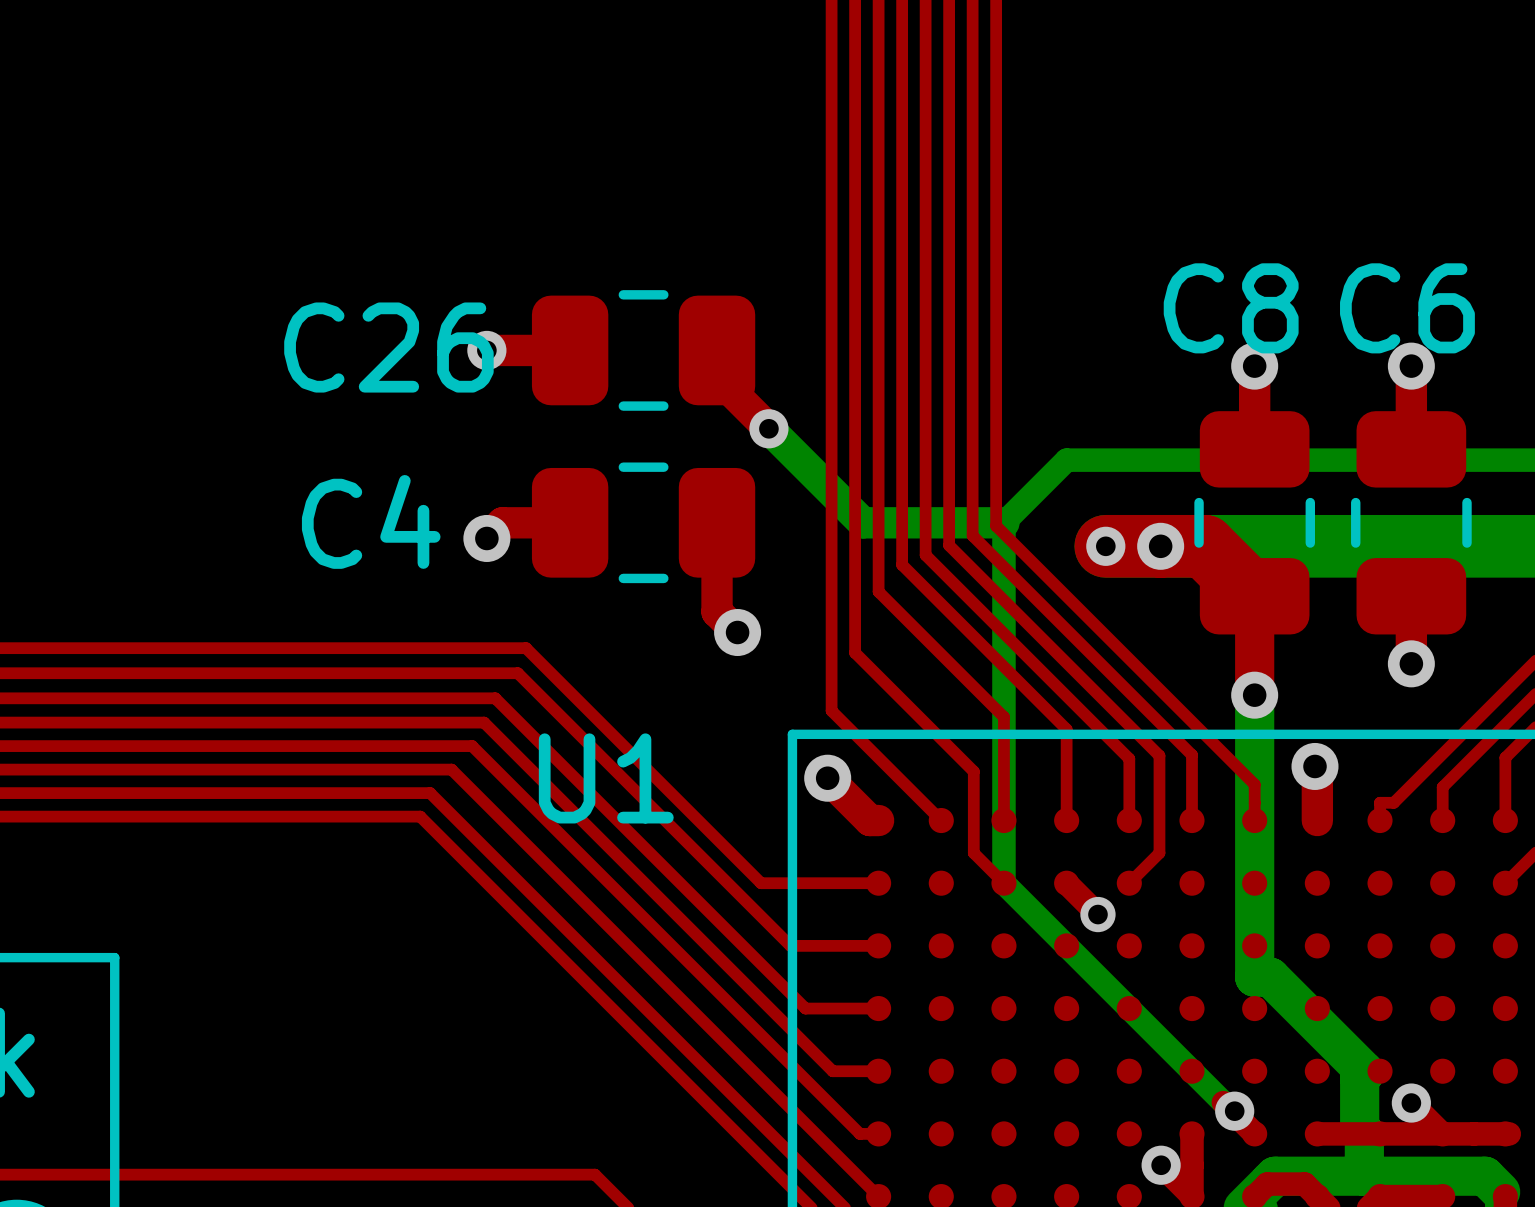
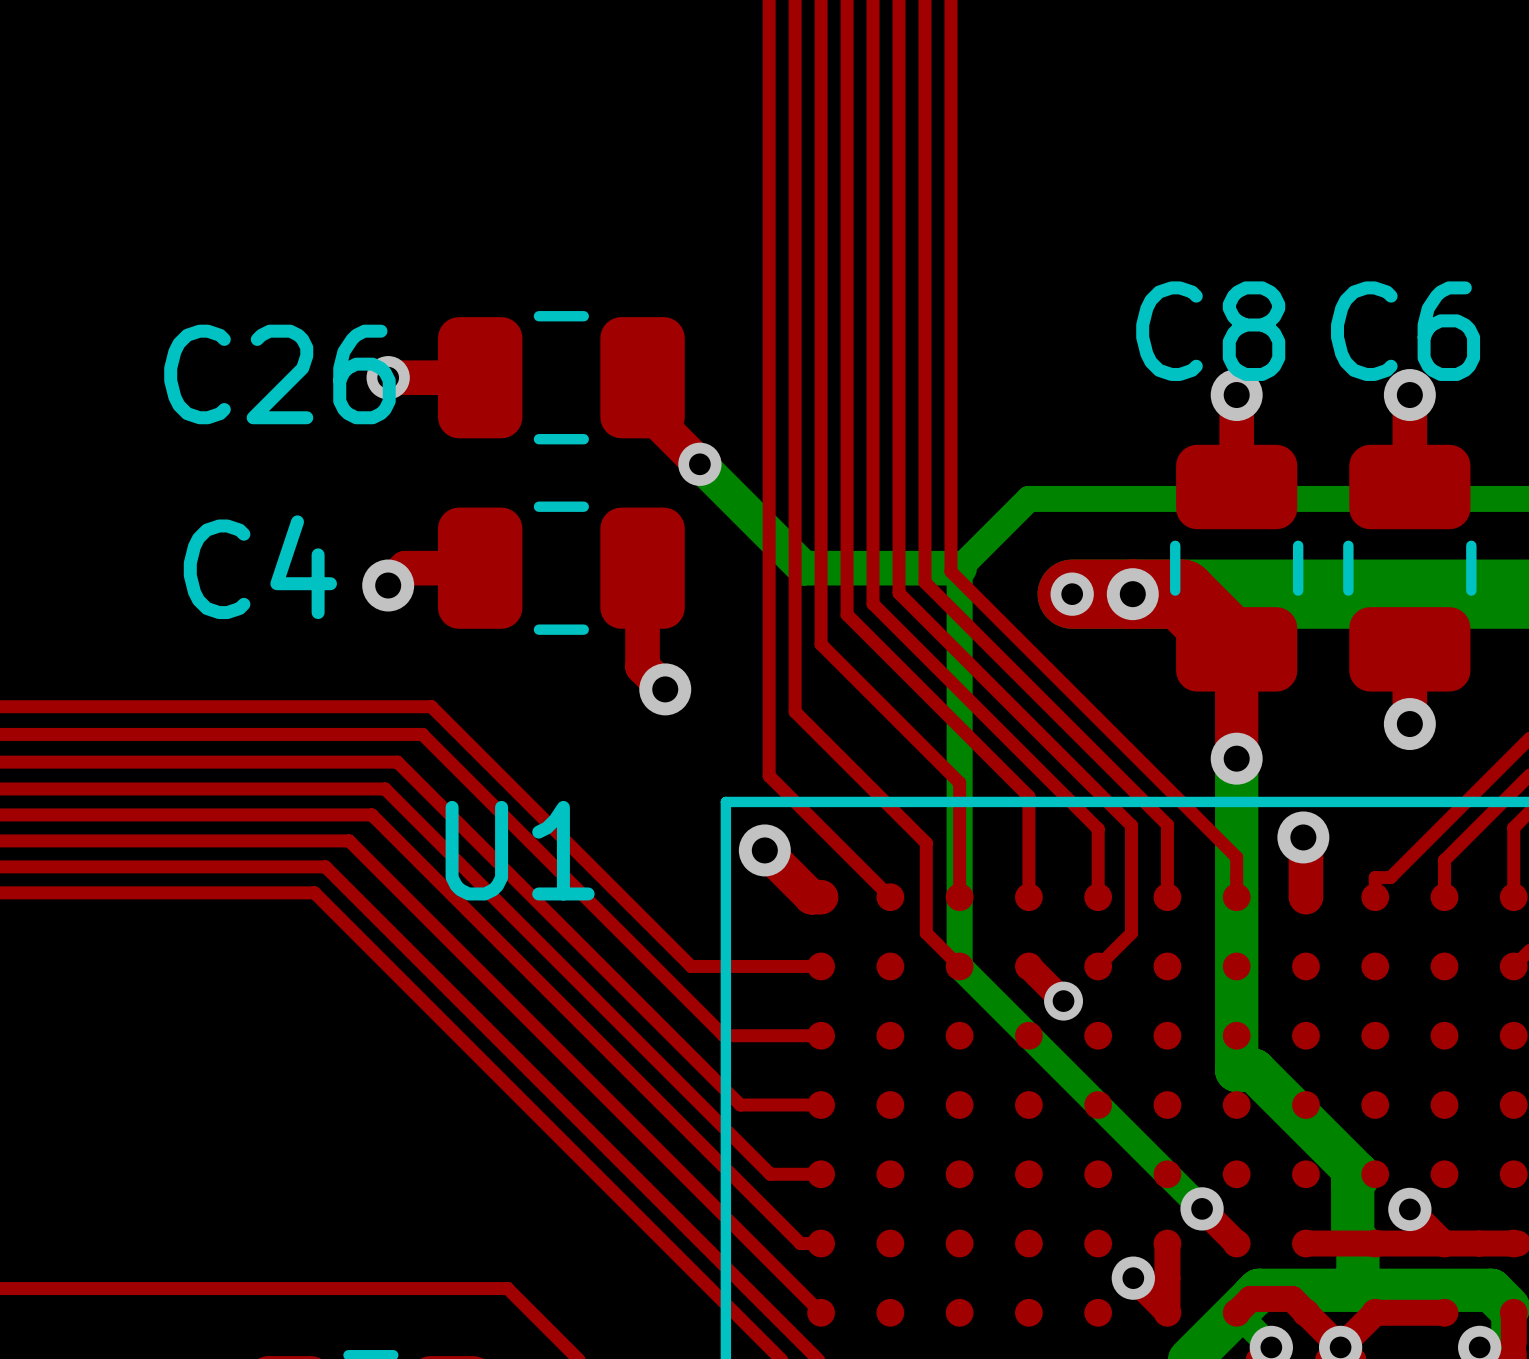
via position: (1234, 1111) -> (1202, 1208)

